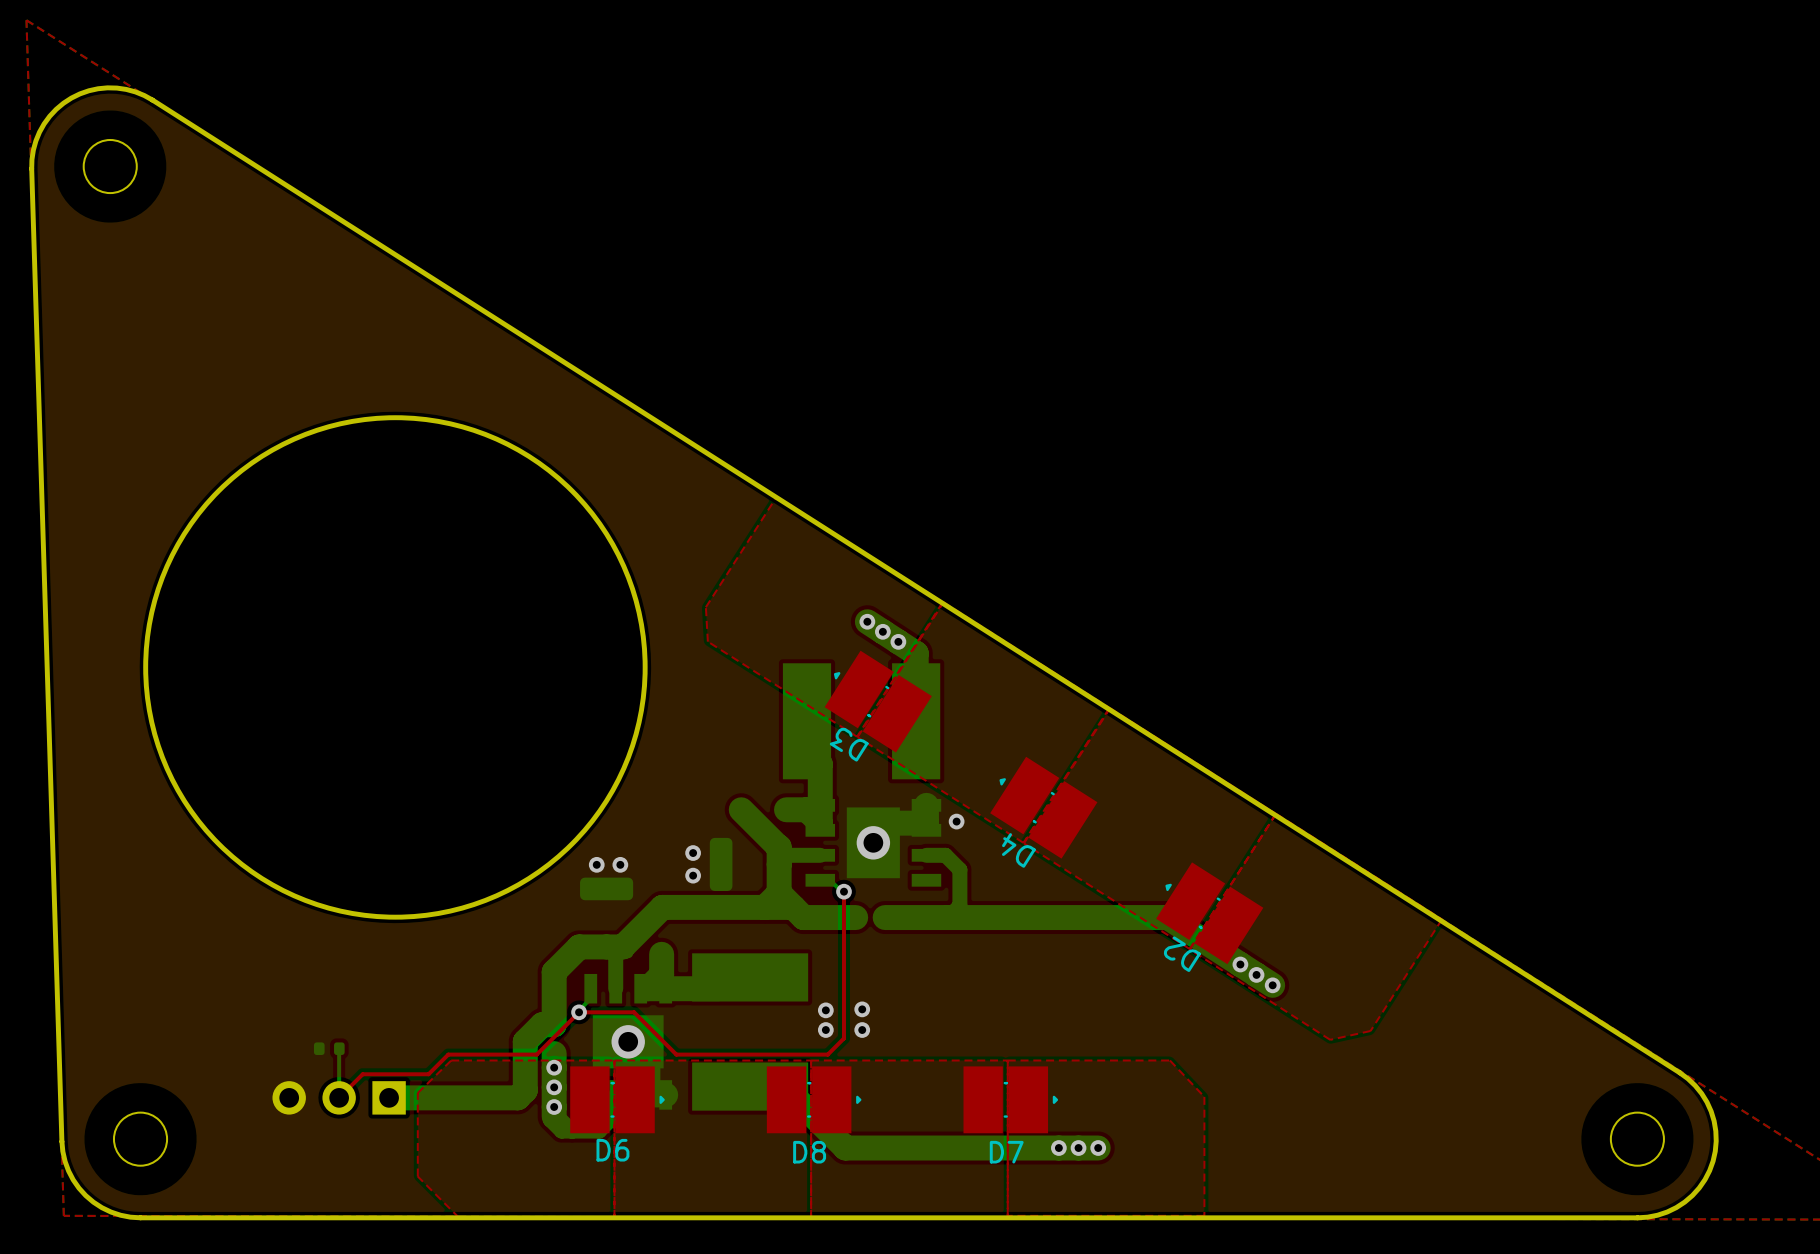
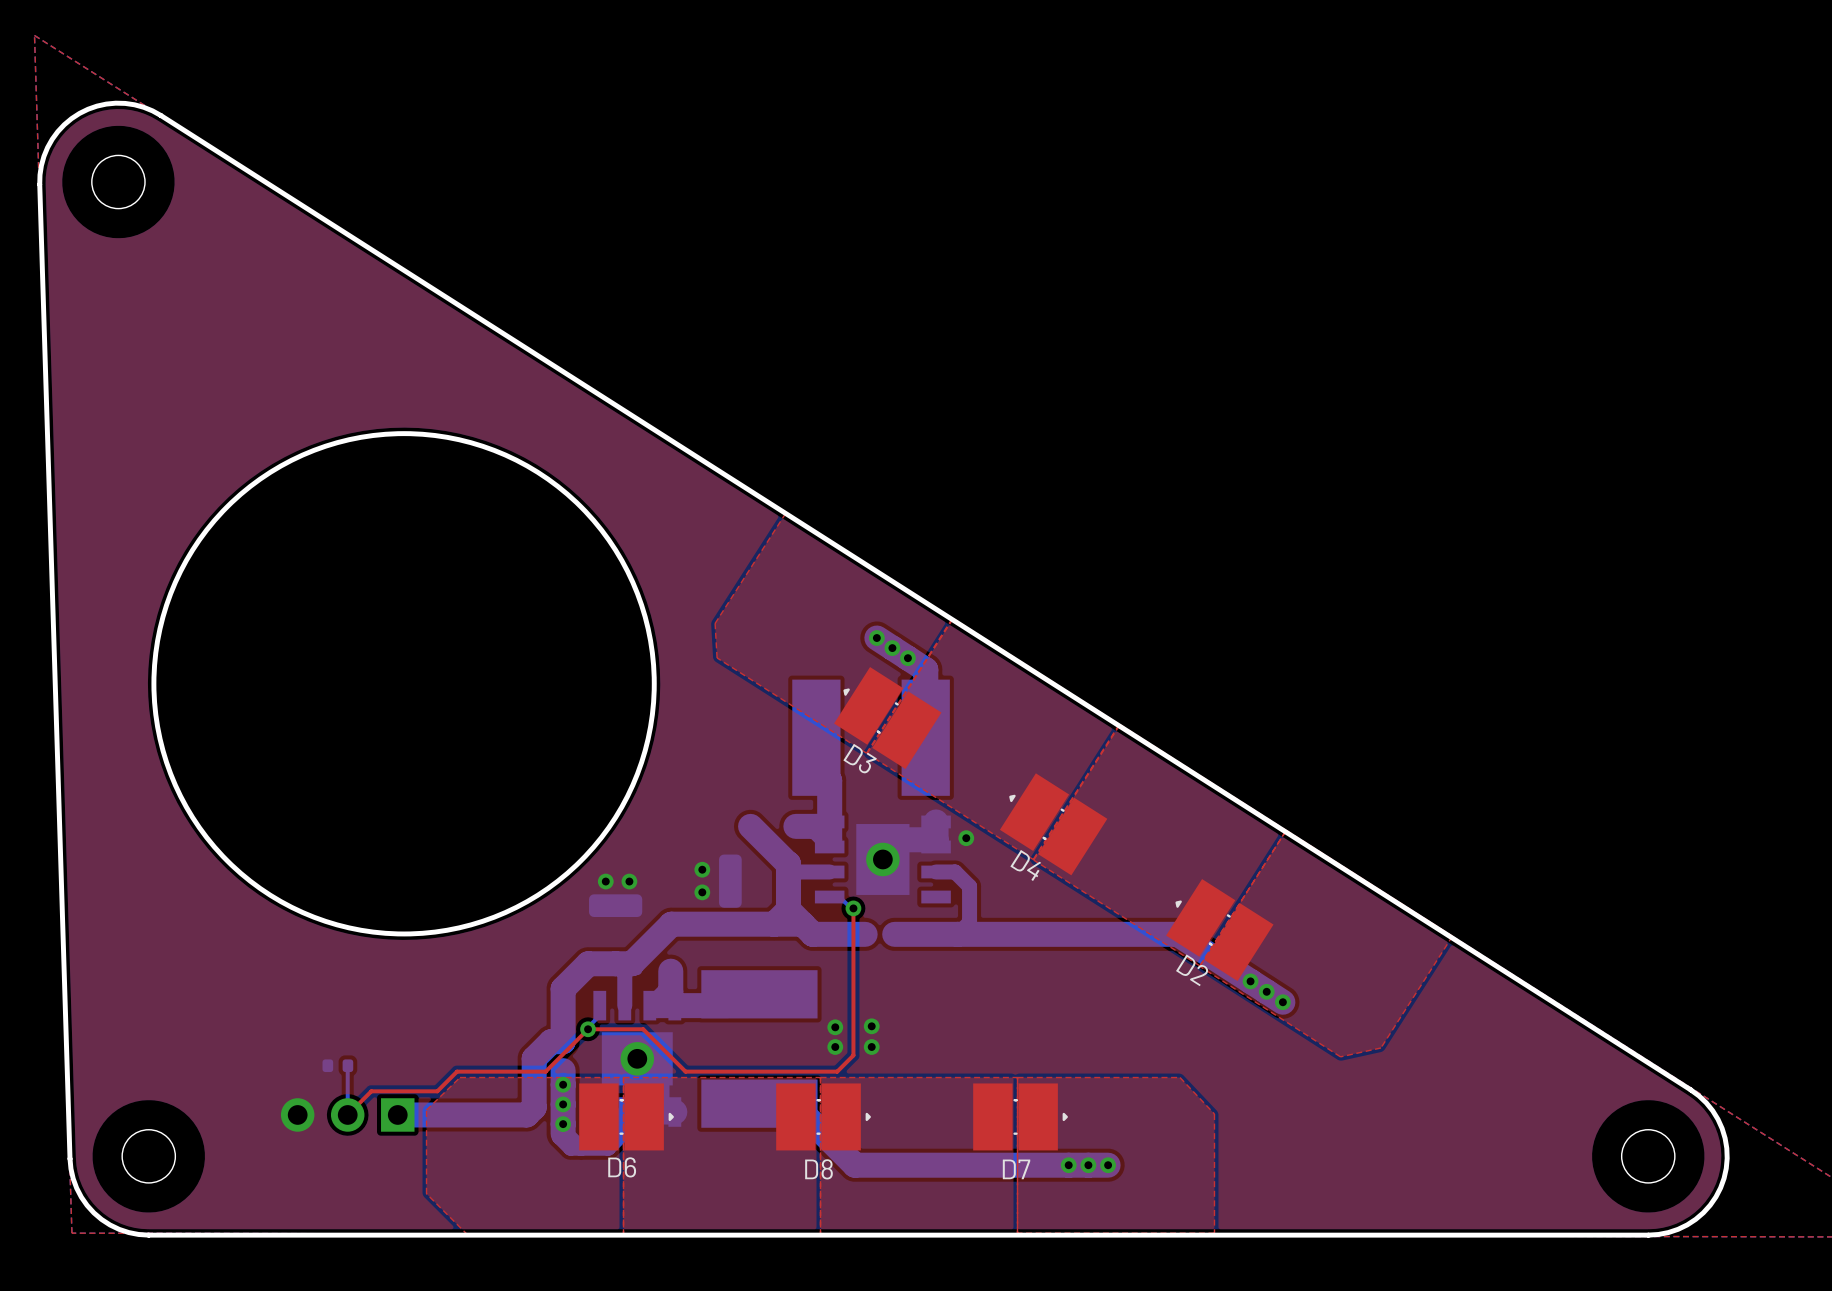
D3 name rotation: 0° (849, 744) -> 180° (860, 758)
D4 name rotation: 0° (1018, 850) -> 180° (1025, 865)
D2 name rotation: 0° (1182, 954) -> 180° (1192, 970)

